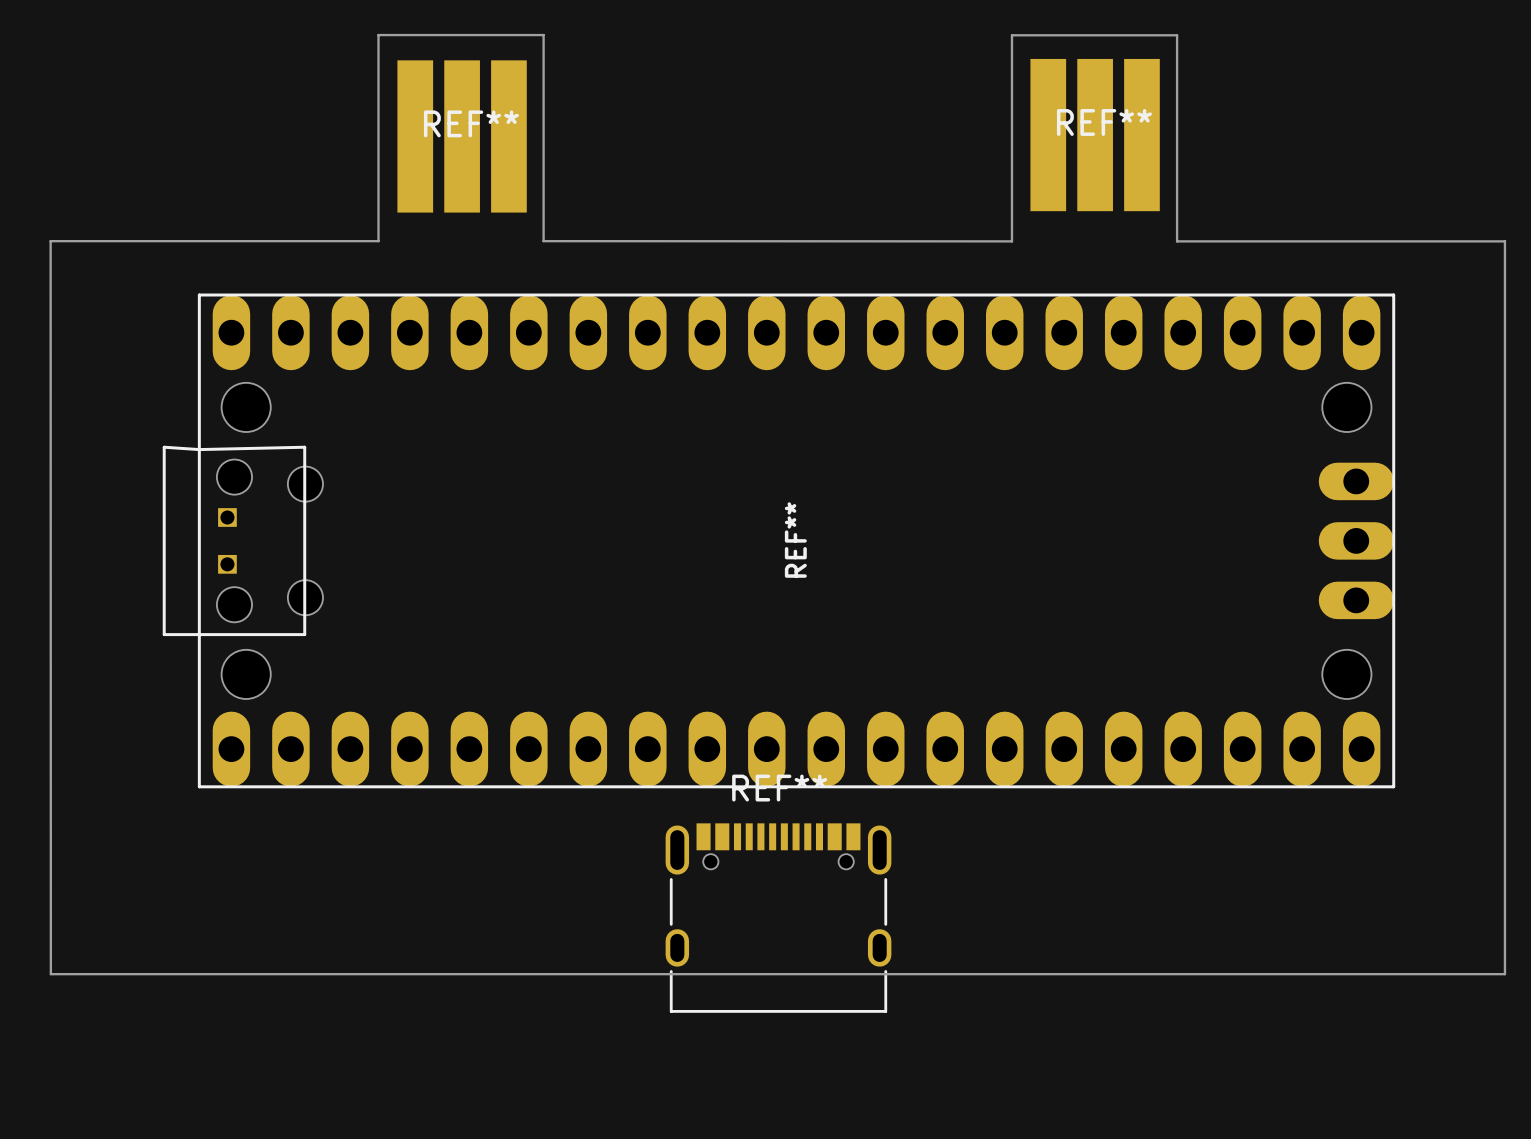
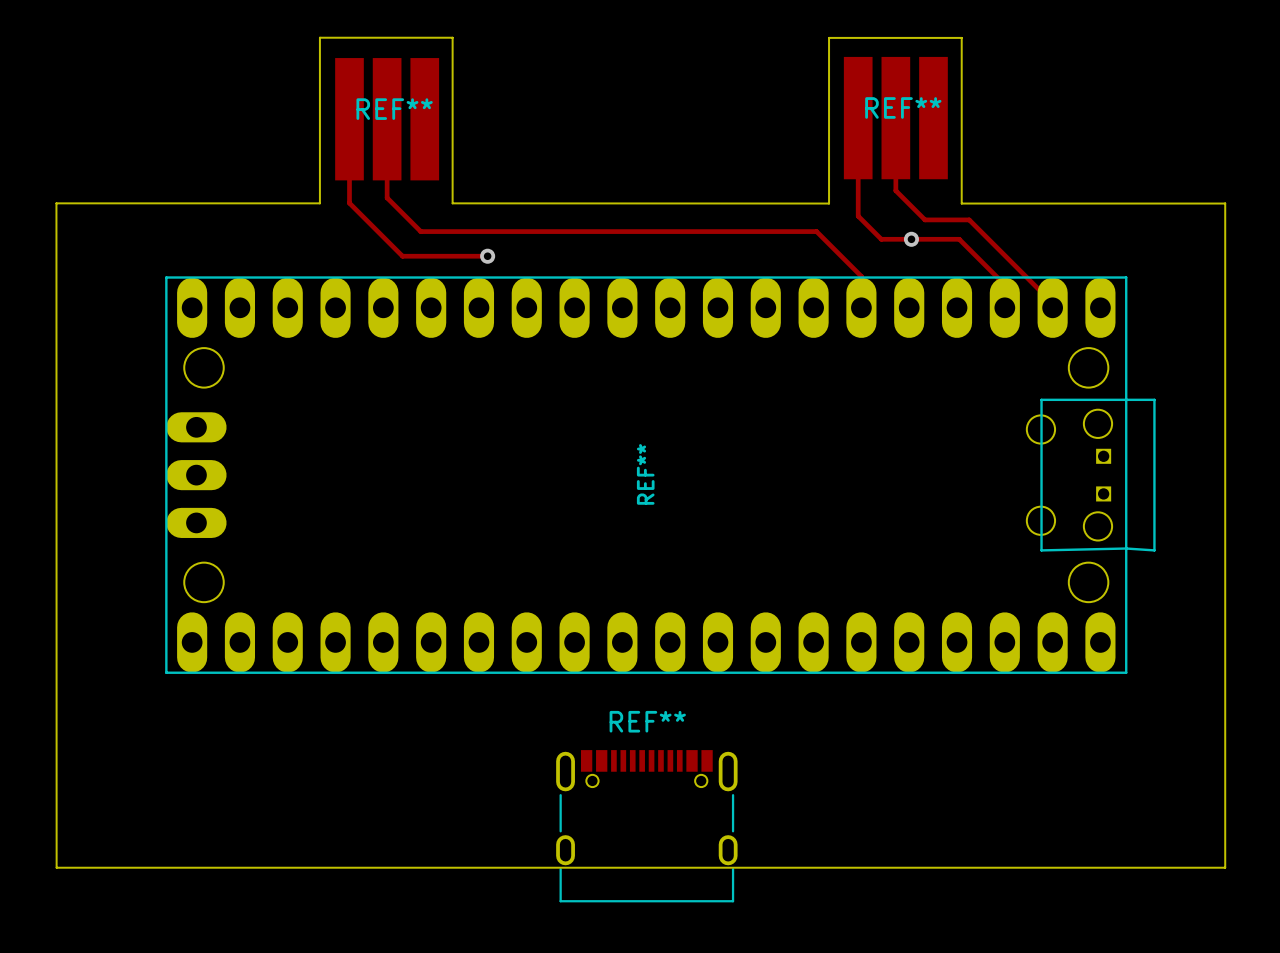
track: none -> (858, 118) (858, 216) (881, 239) (959, 239) (1004, 284) (1004, 307)
track: none -> (895, 118) (895, 190) (925, 219) (969, 219) (1052, 303) (1052, 307)
track: none -> (349, 119) (349, 203) (402, 256) (487, 256)
track: none -> (387, 119) (387, 197) (420, 231) (816, 231) (861, 276) (861, 307)
board edge: (50, 241) (50, 974) (1504, 974) -> (56, 203) (56, 867) (1225, 867) (1225, 792)
via: none -> (911, 239)
via: none -> (487, 256)
REF** rotation: 0° (778, 540) -> 180° (660, 475)
REF** position: (778, 918) -> (646, 826)

